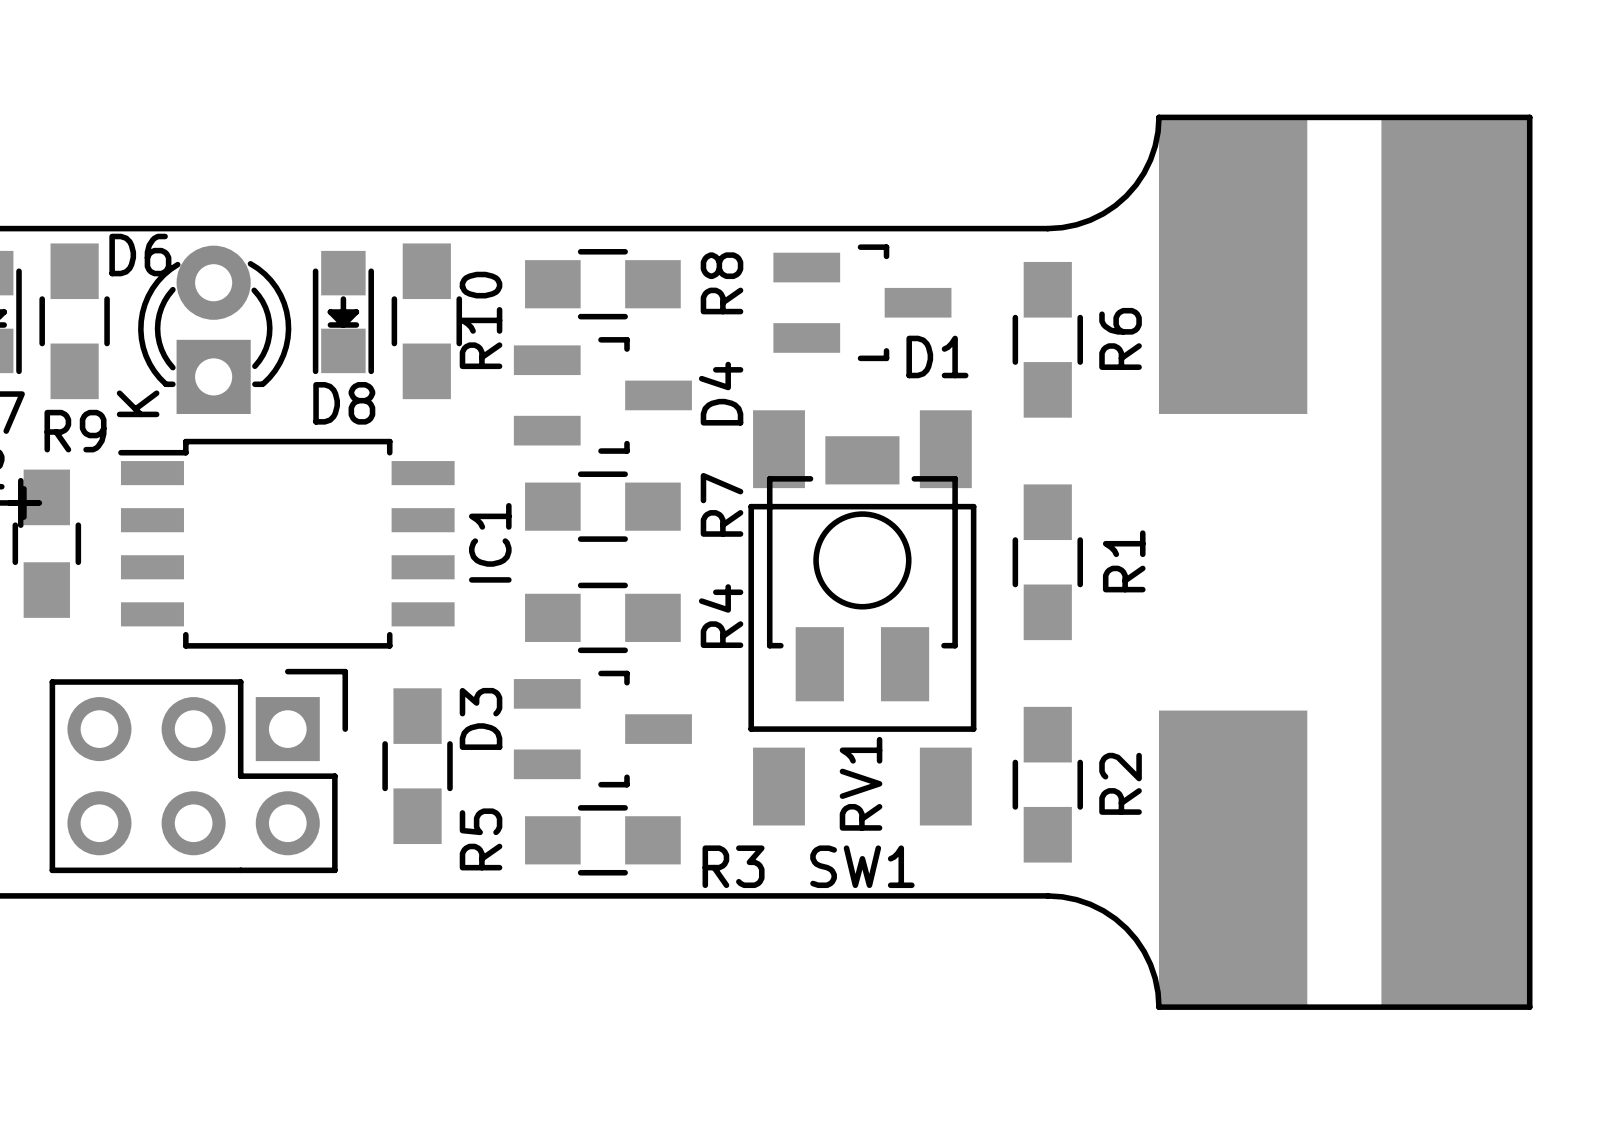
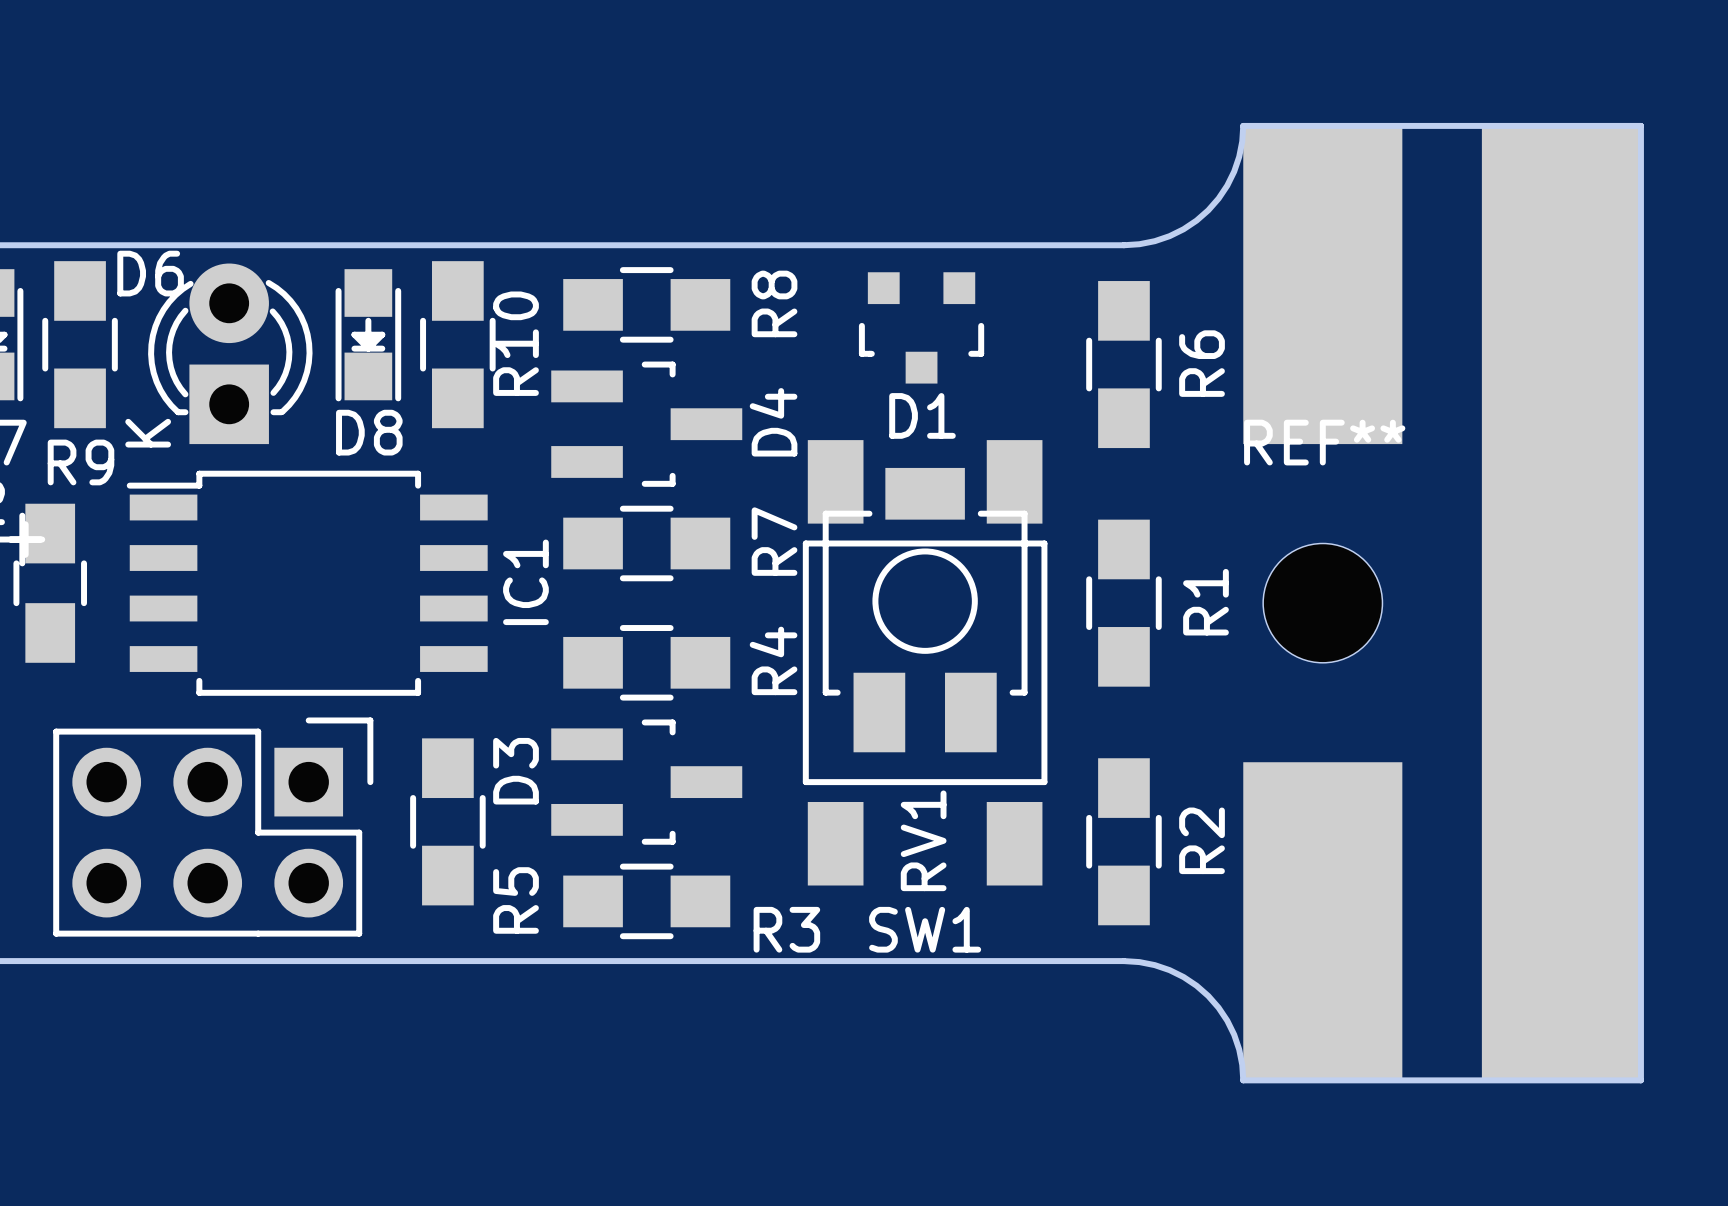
D1 footprint: [773, 244, 952, 362] -> [858, 272, 985, 384]
D1 name position: D1 (937, 356) -> D1 (922, 415)
part: none -> (1322, 603)

